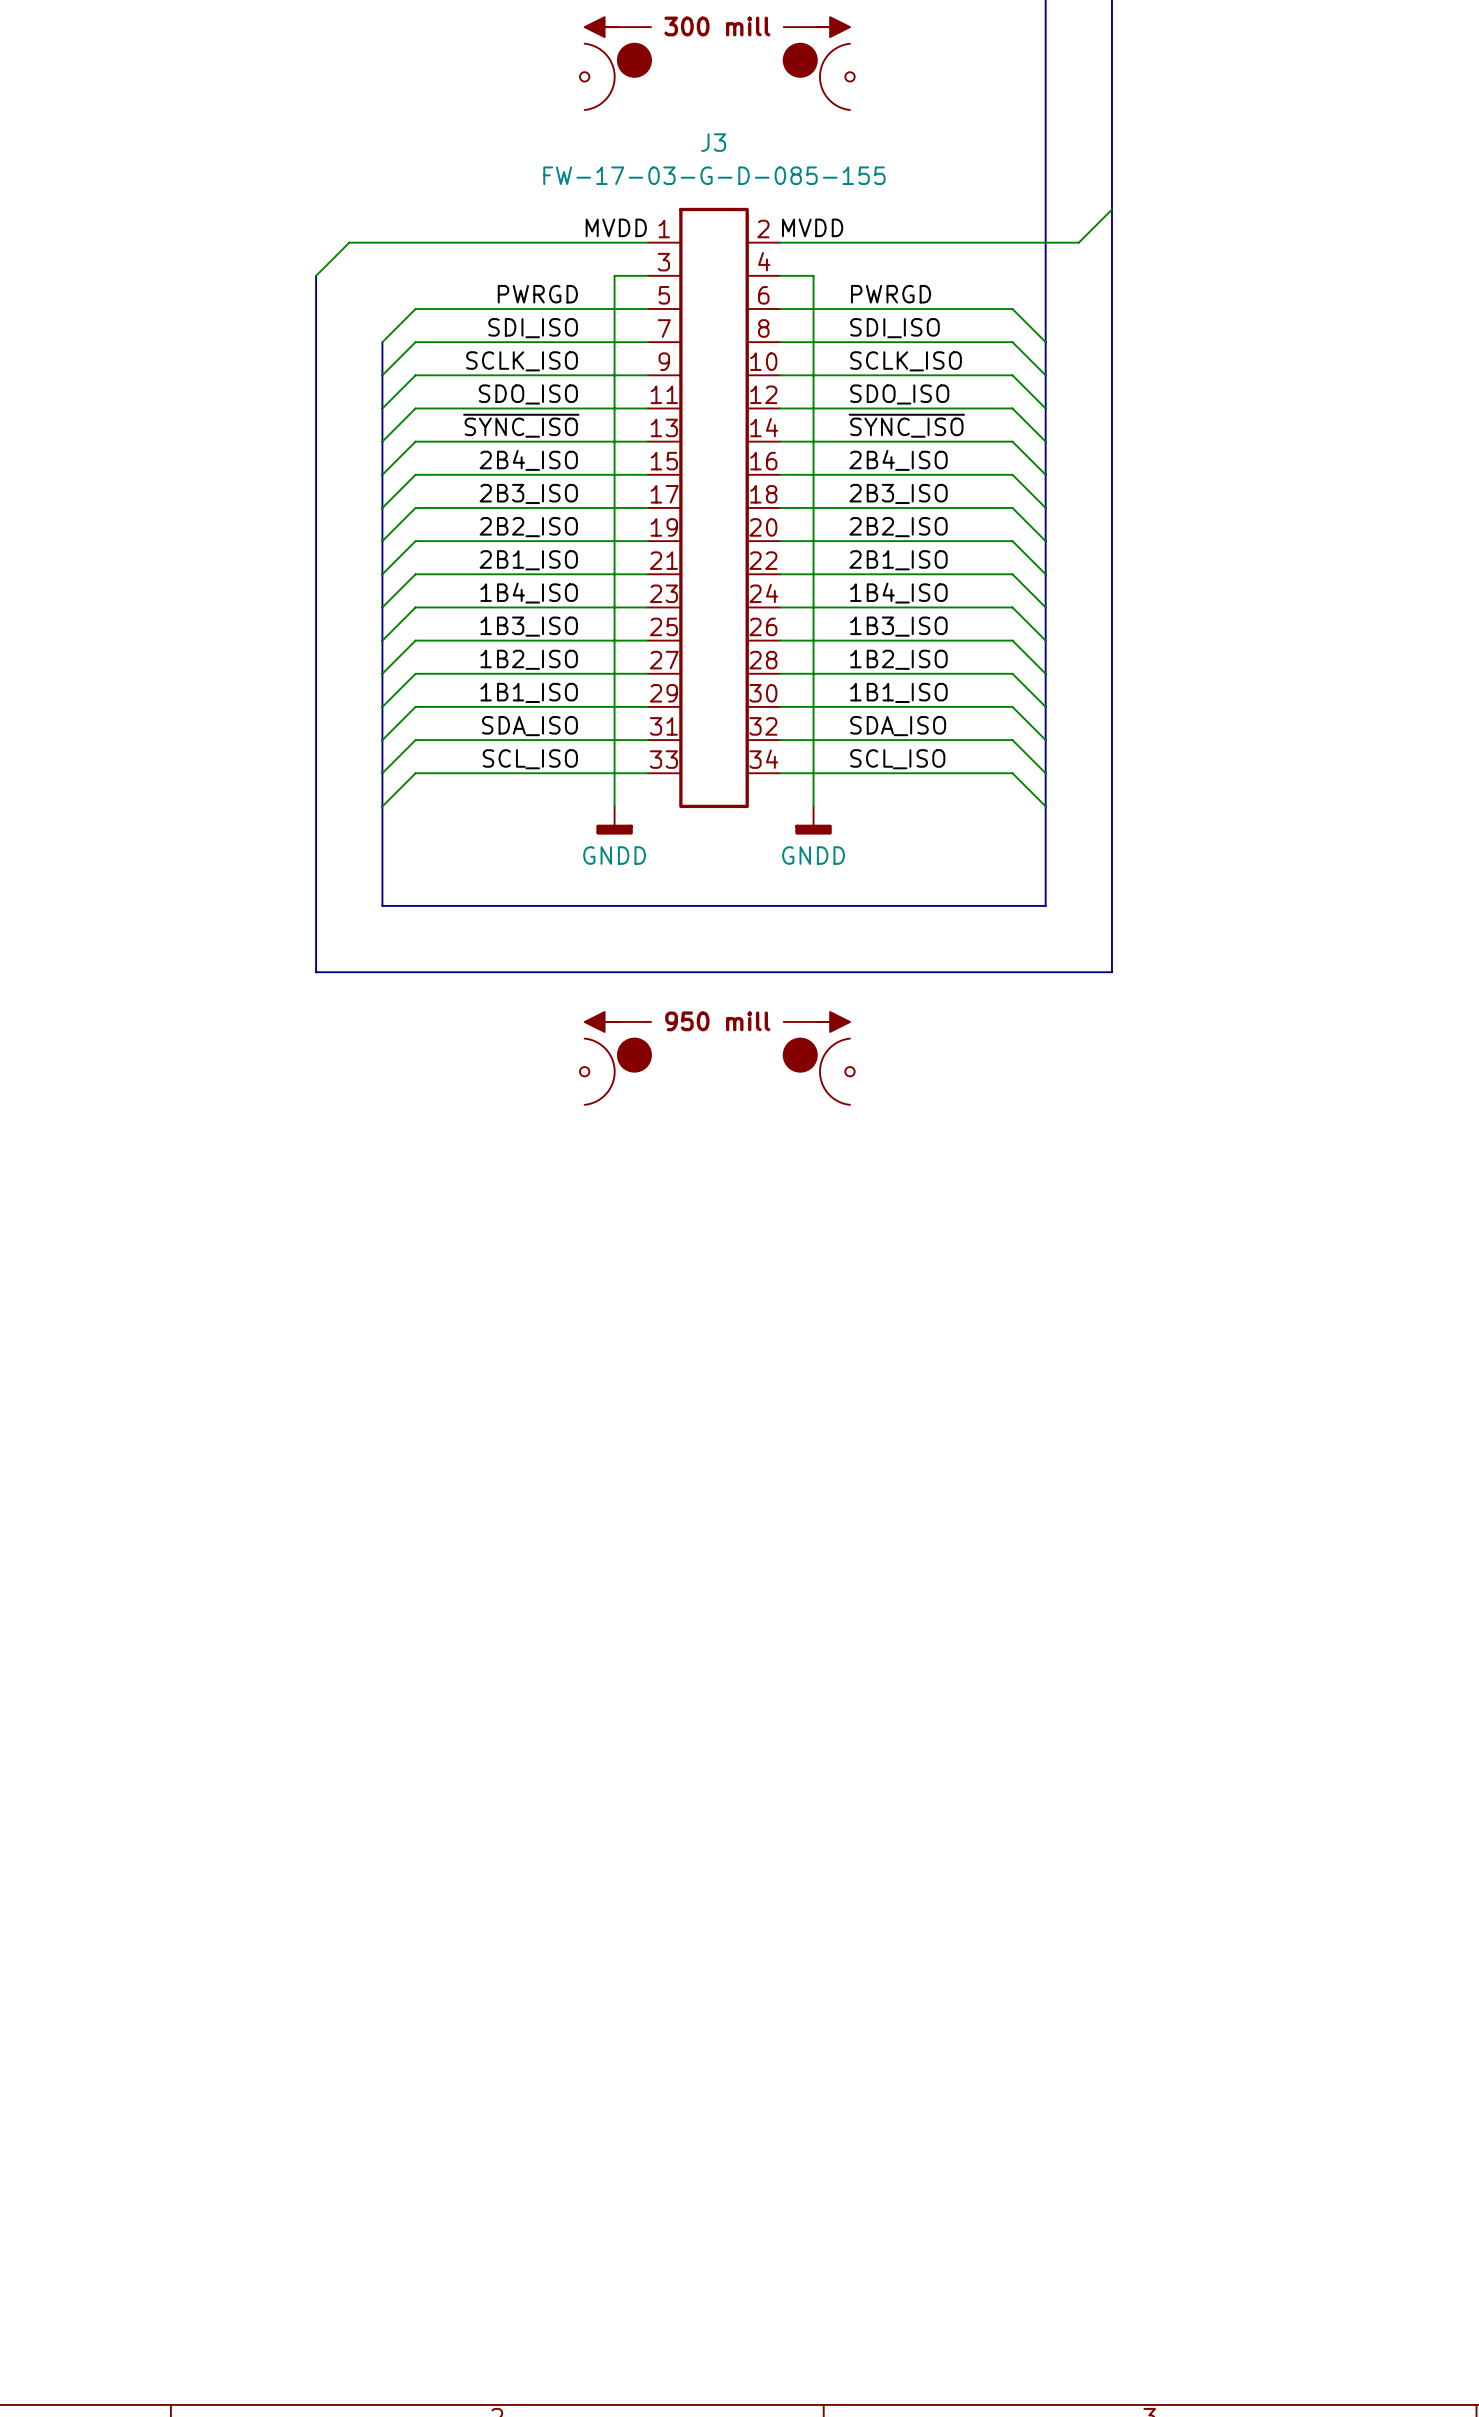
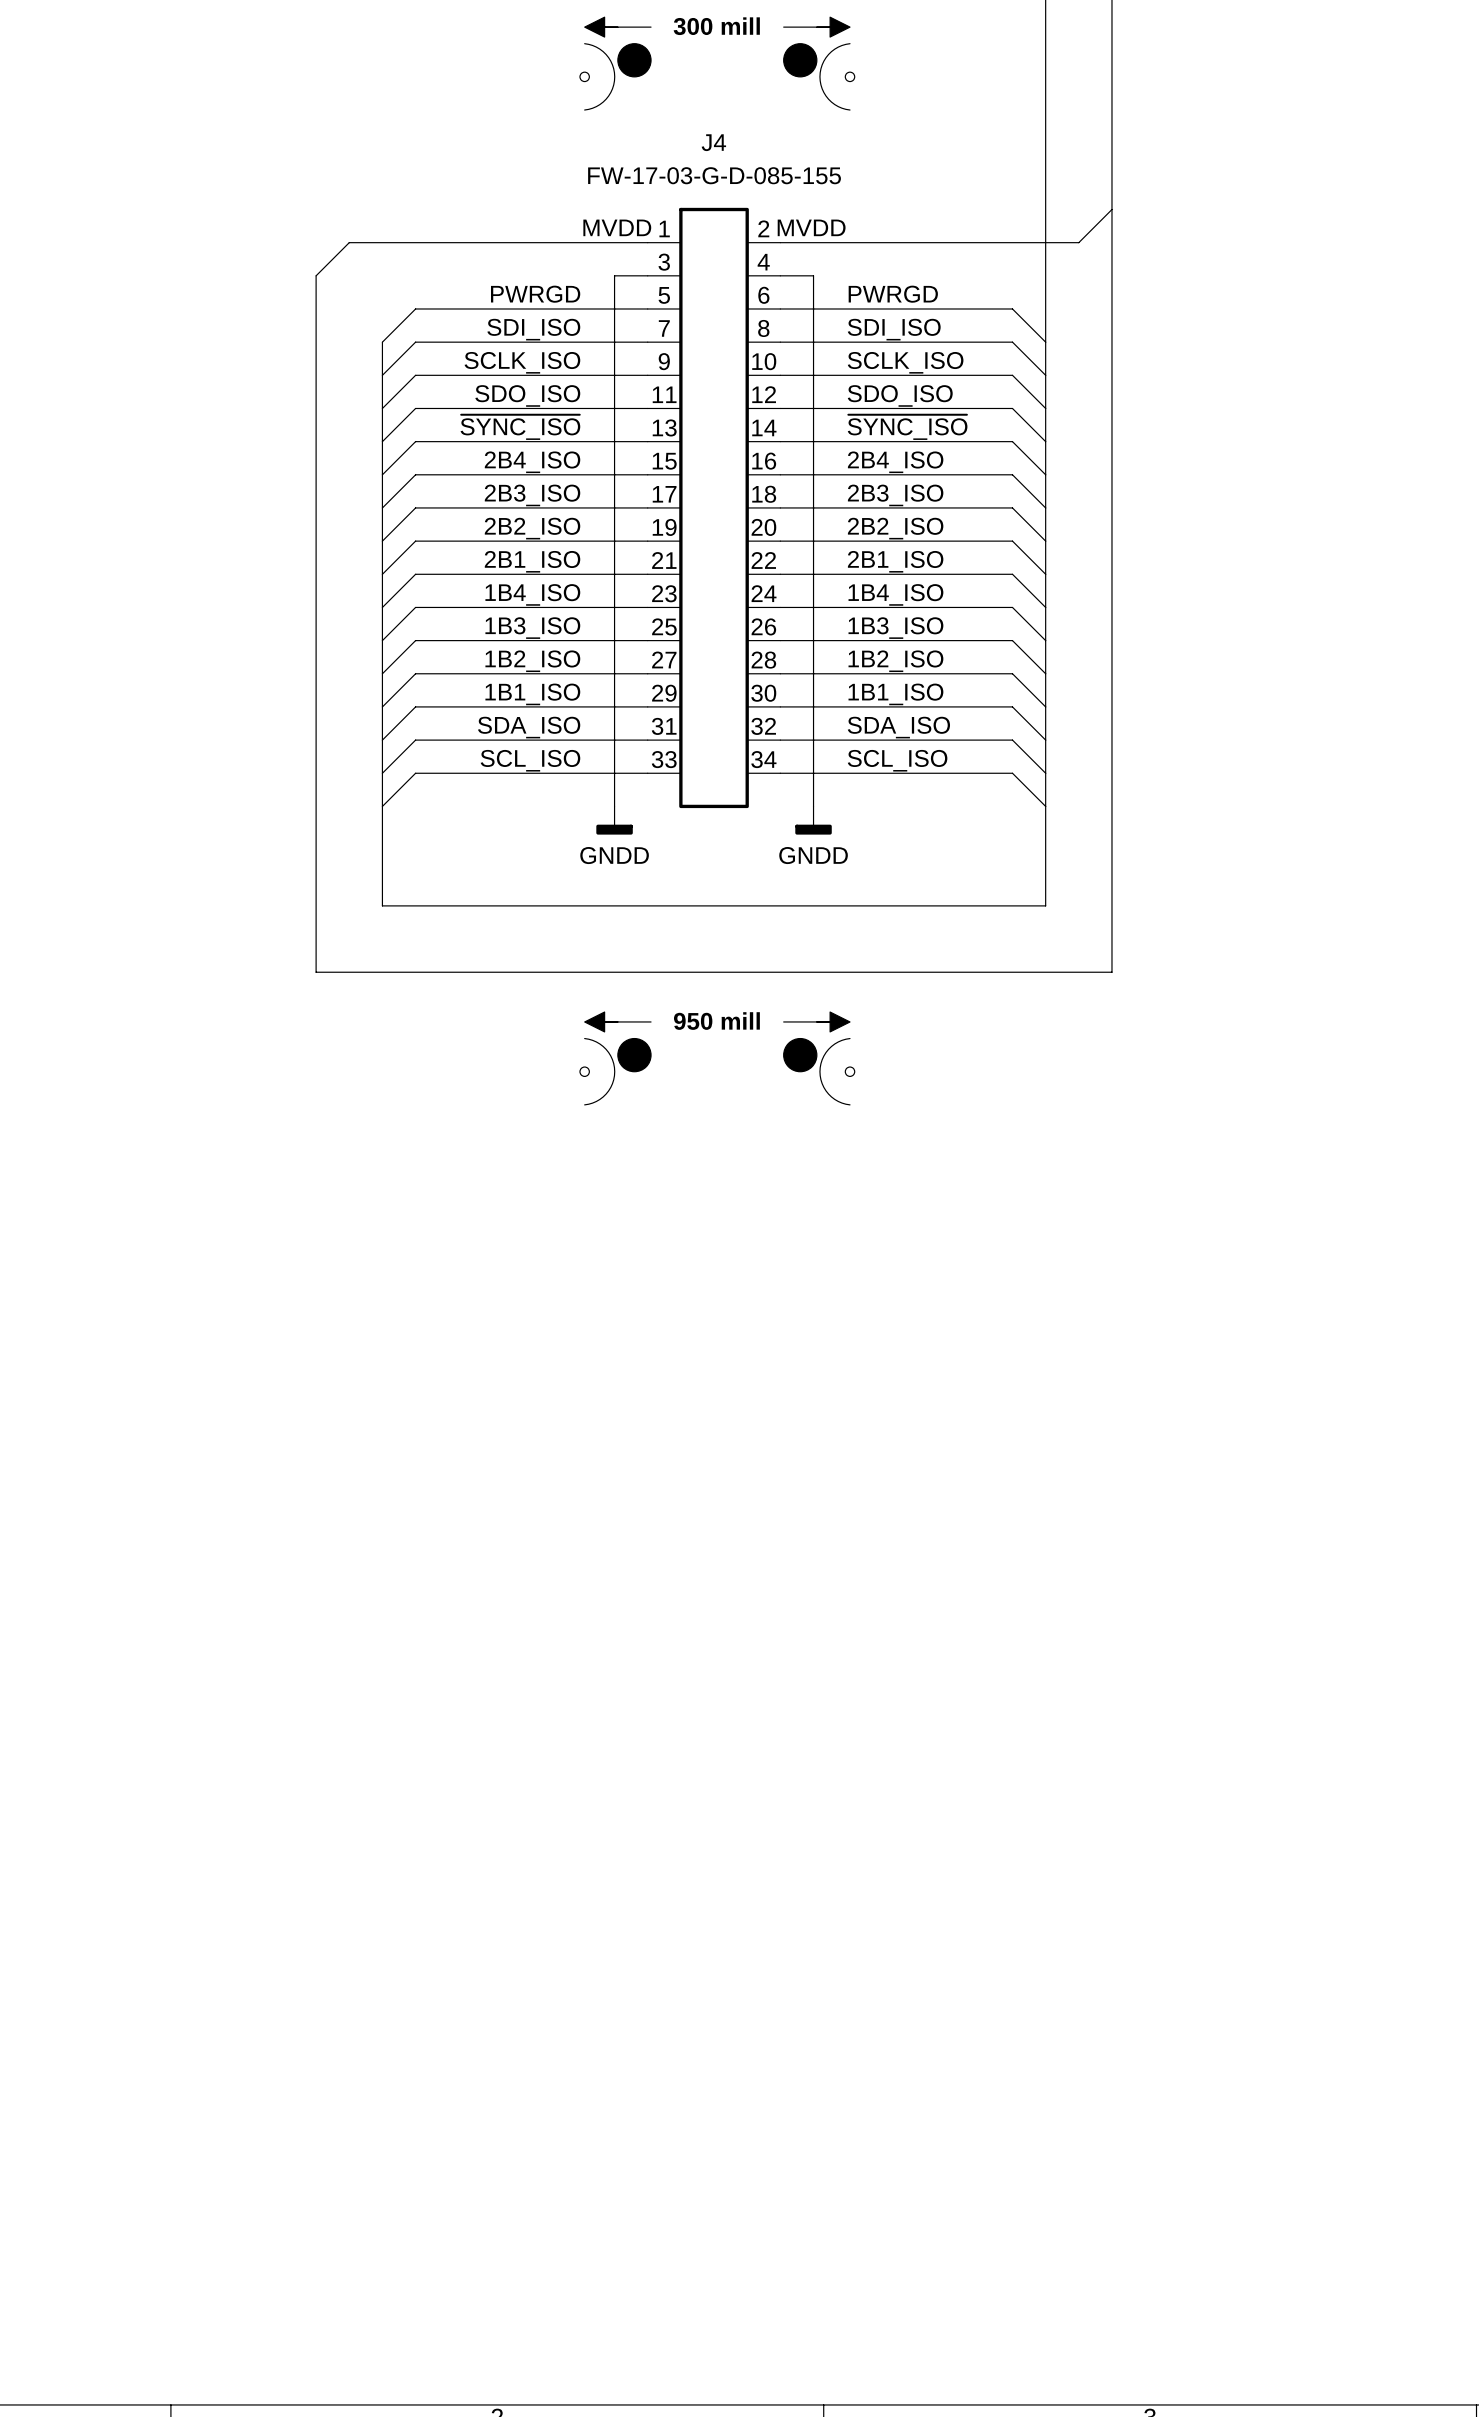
J3 name: J3 (713, 142) -> J4 (713, 142)

